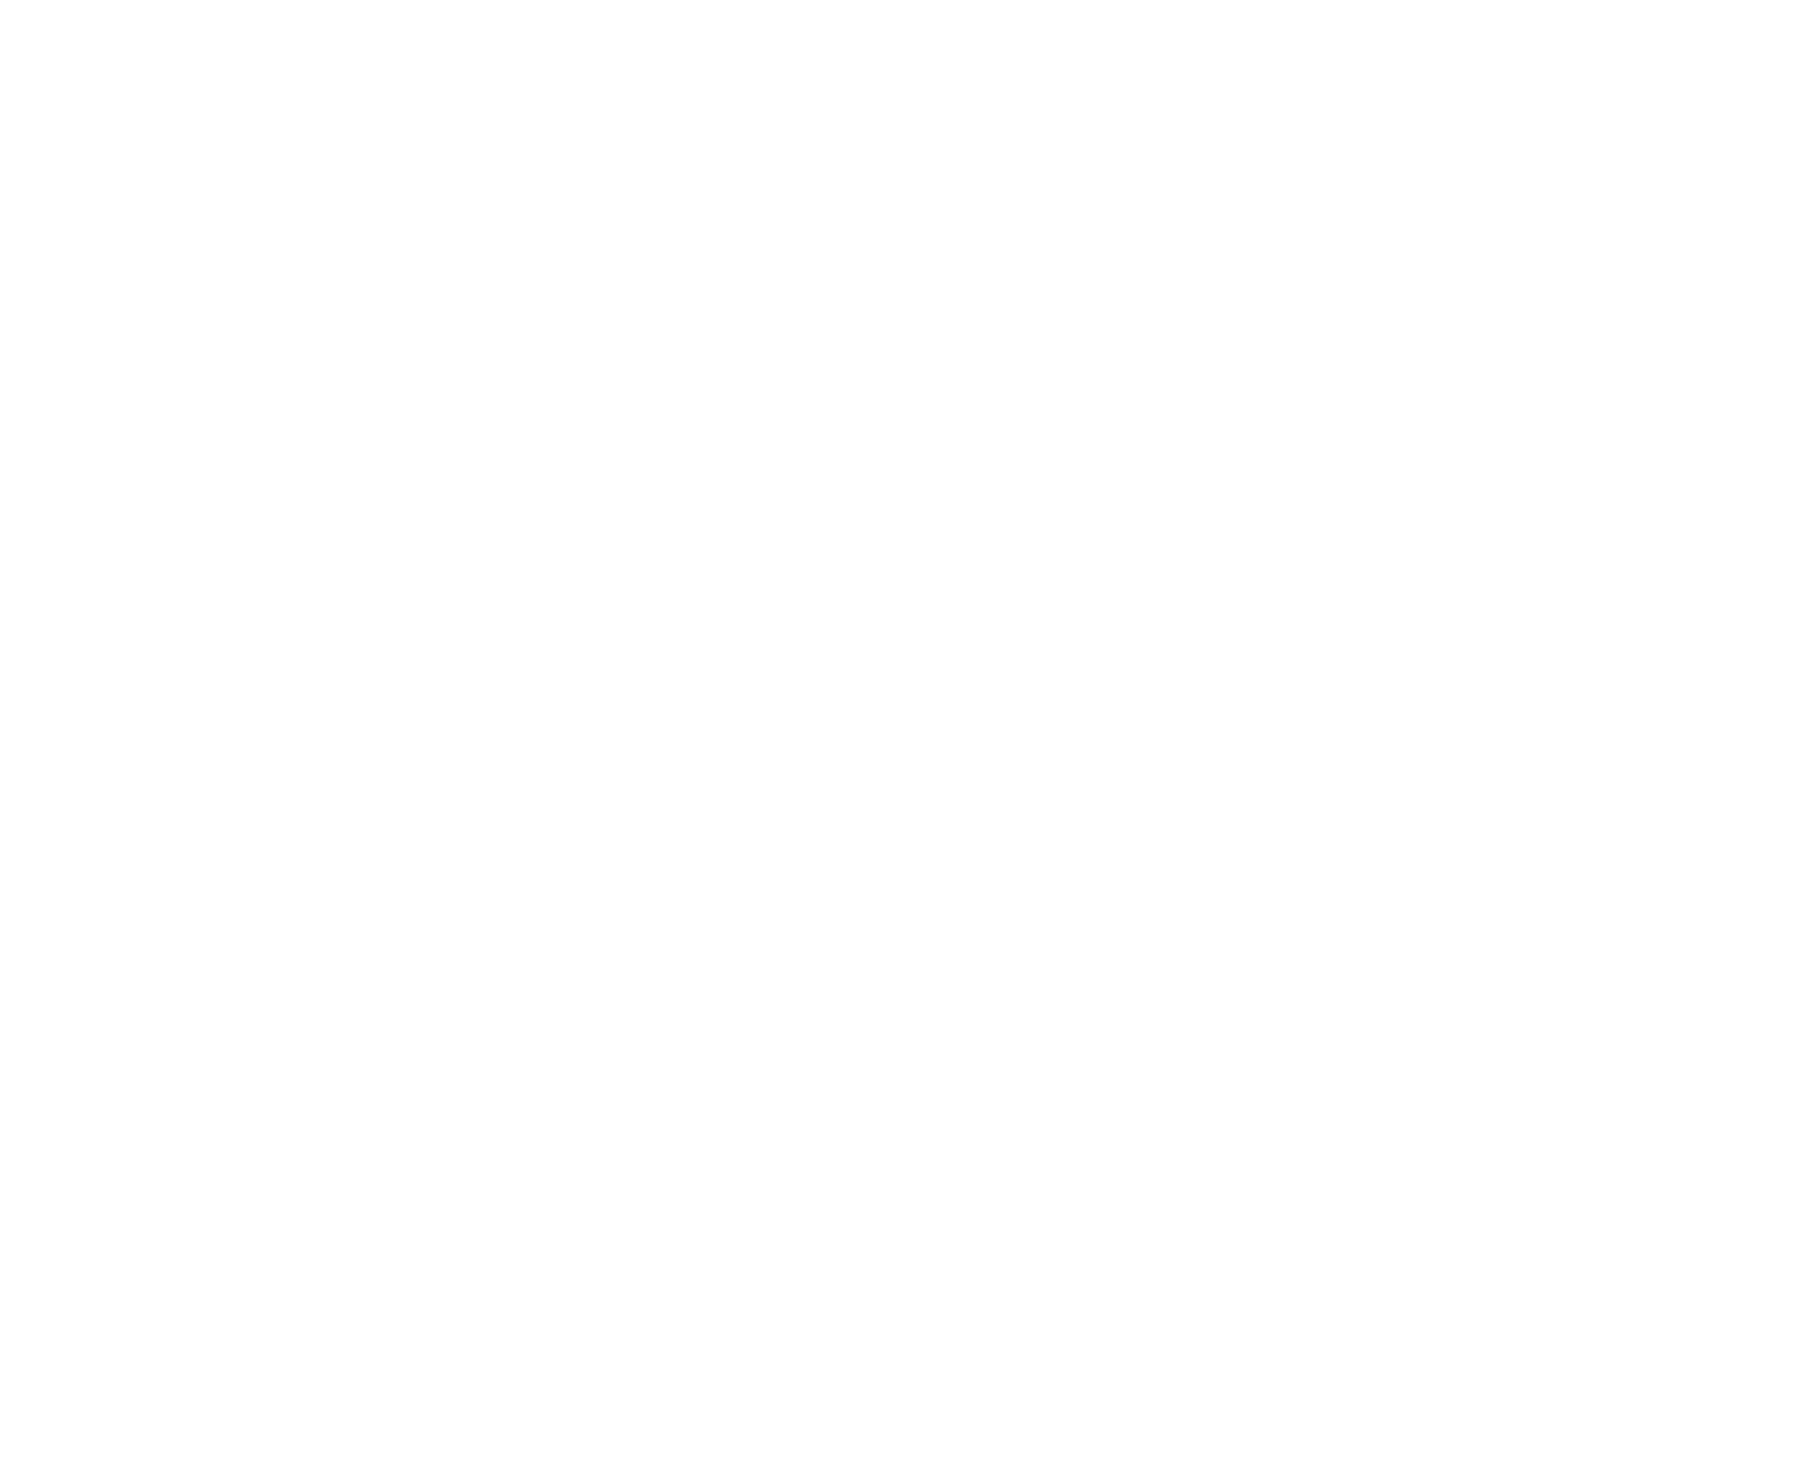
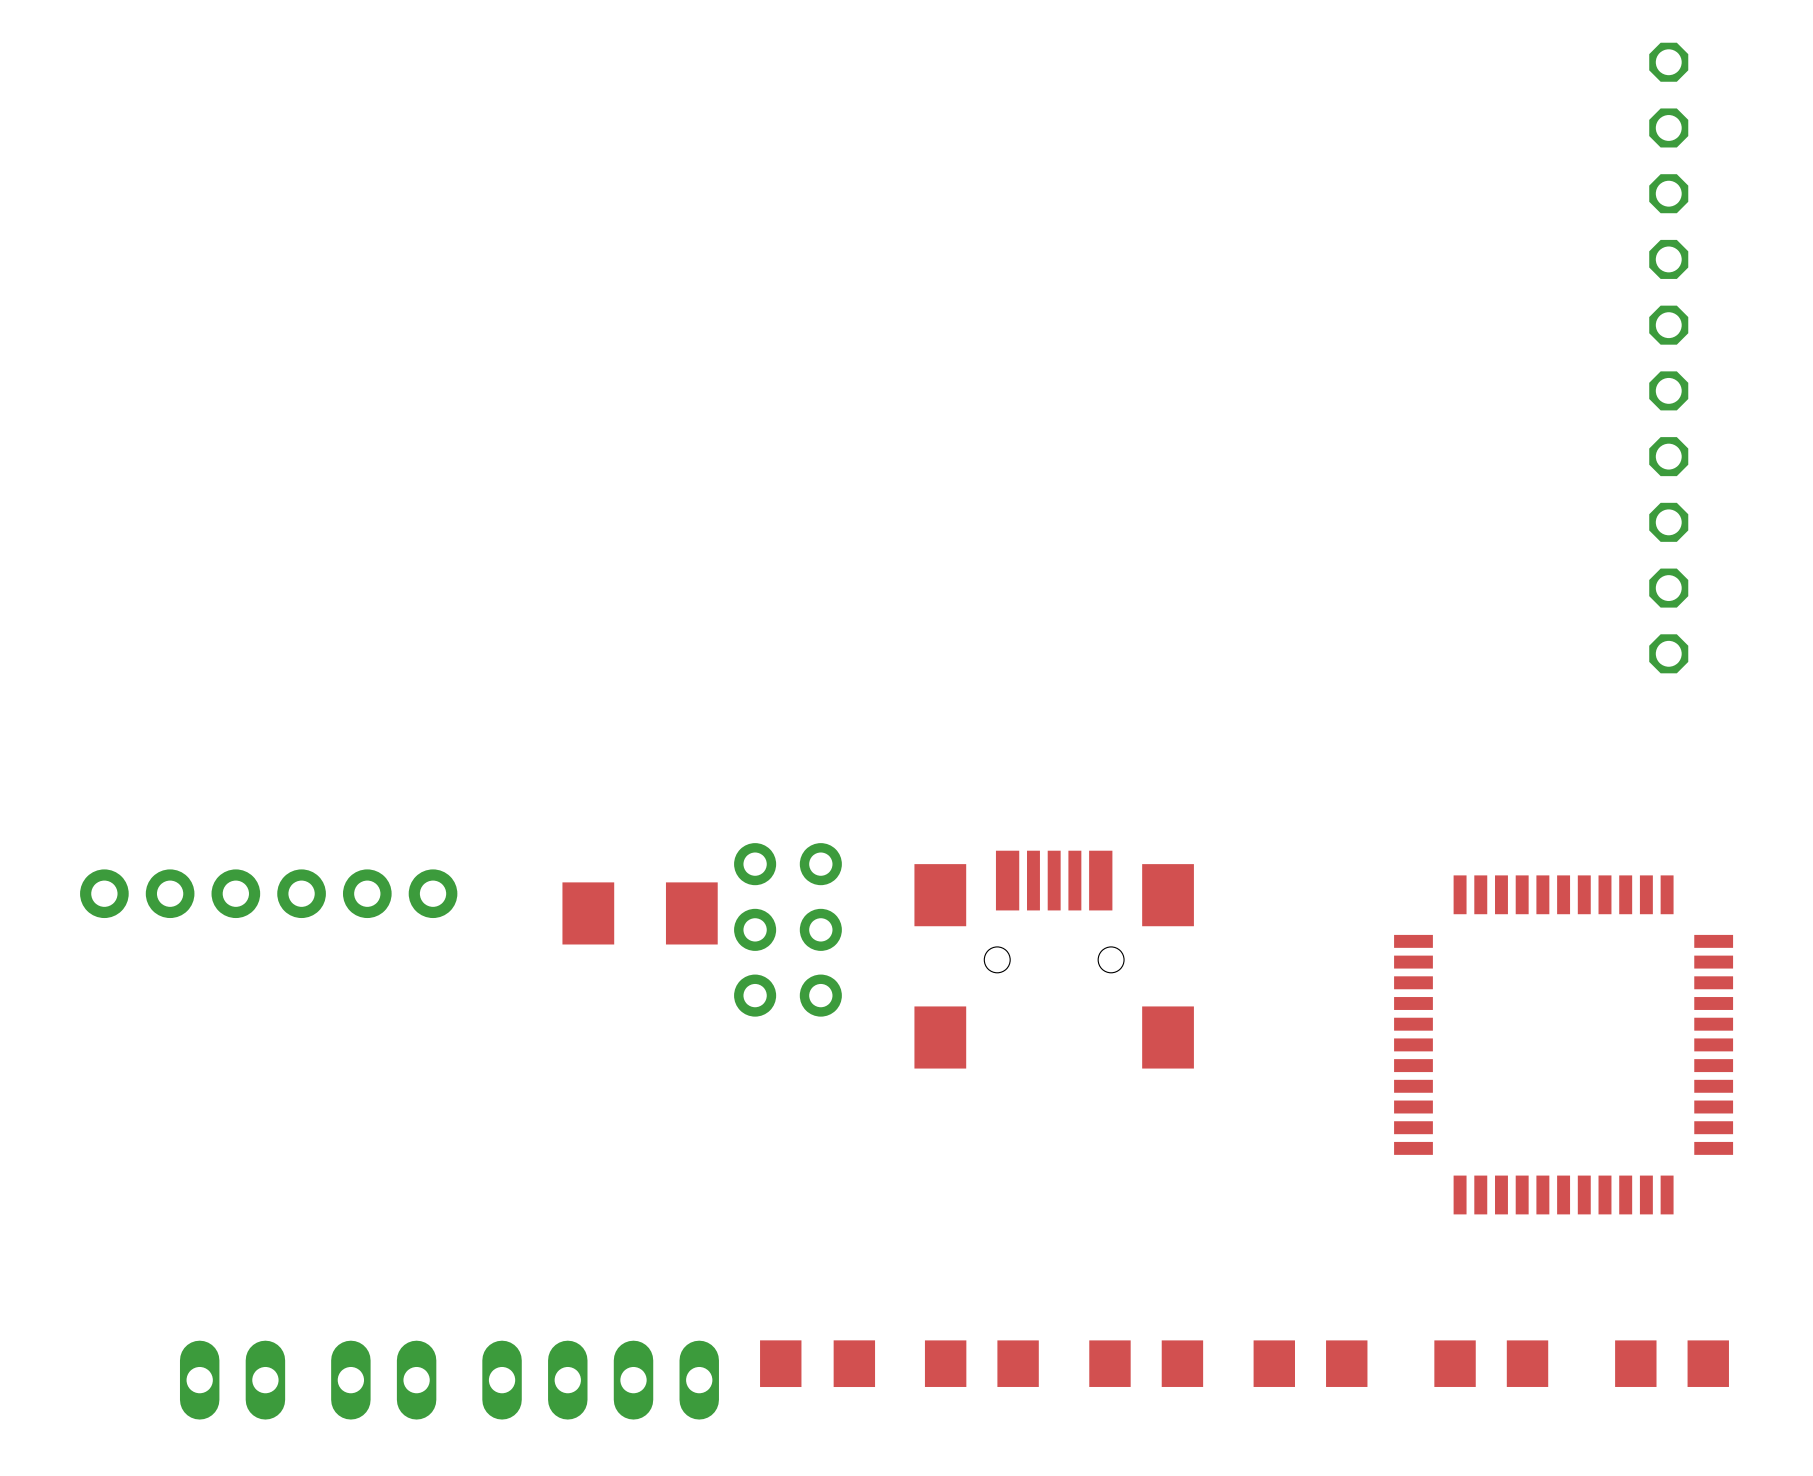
part: none -> (1668, 358)
part: none -> (268, 893)
part: none -> (640, 913)
part: none -> (787, 929)
part: none -> (1054, 959)
part: none -> (1563, 1044)
part: none -> (817, 1363)
part: none -> (981, 1363)
part: none -> (1146, 1363)
part: none -> (1310, 1363)
part: none -> (1491, 1363)
part: none -> (1672, 1363)
part: none -> (232, 1380)
part: none -> (383, 1380)
part: none -> (600, 1380)

